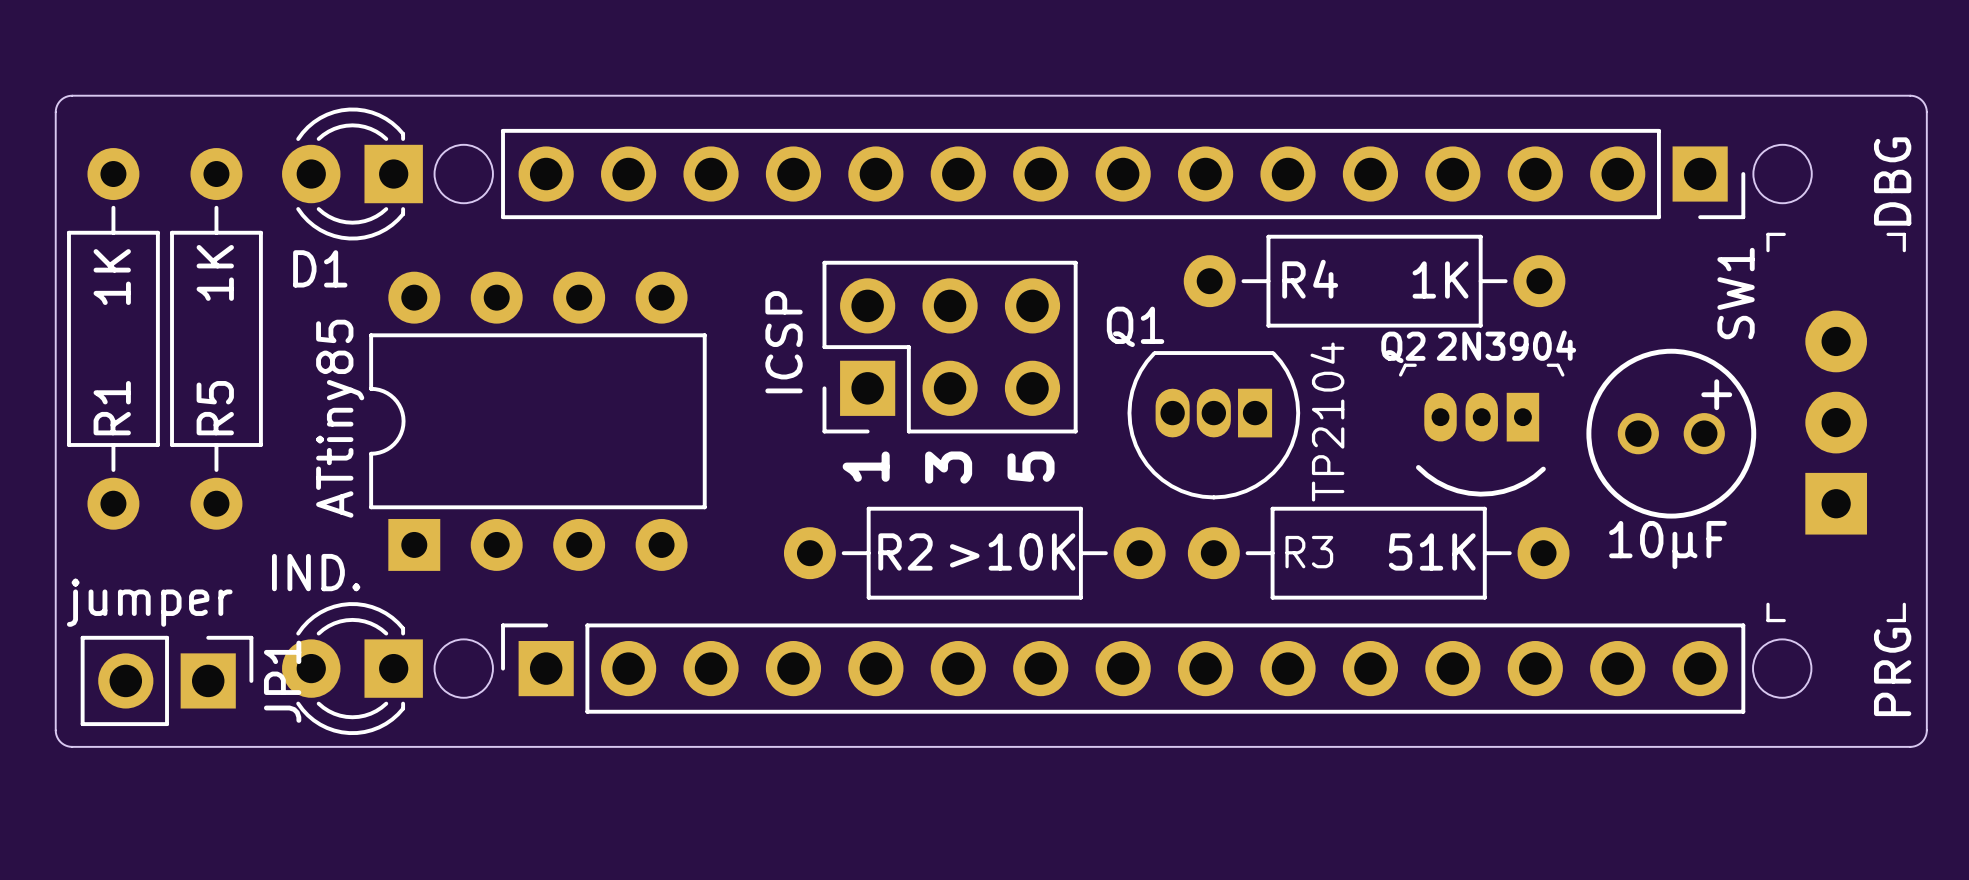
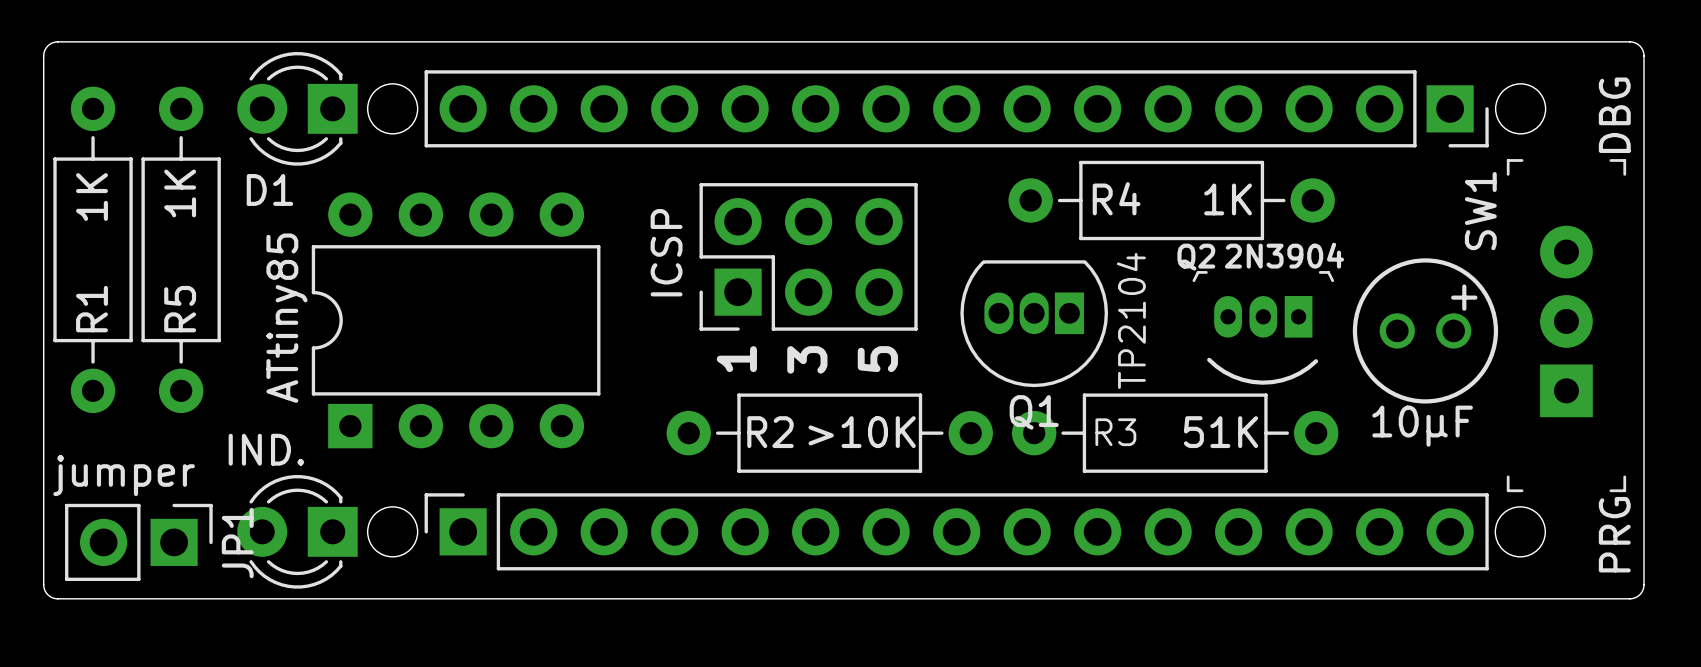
Q1 name position: Q1 (1135, 326) -> Q1 (1034, 412)

